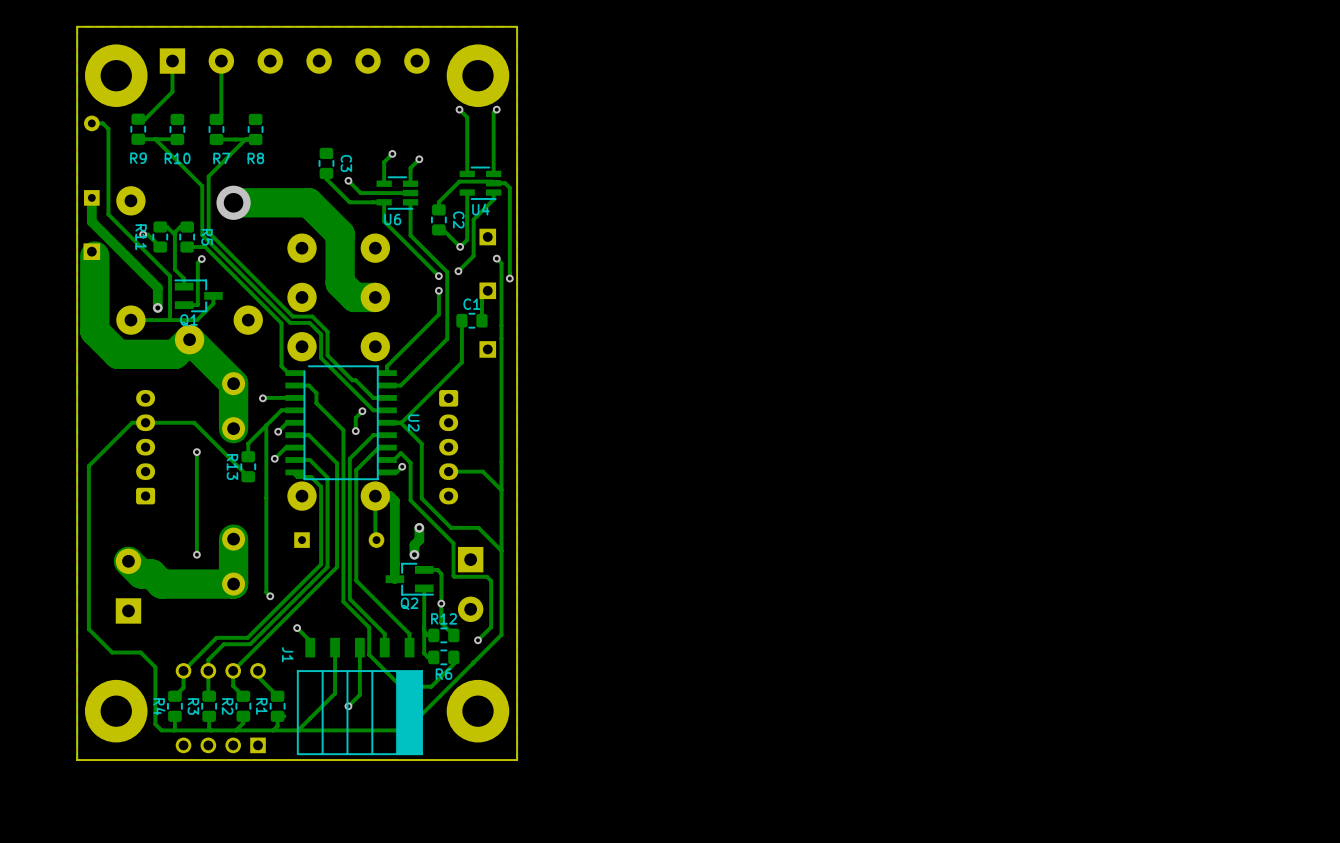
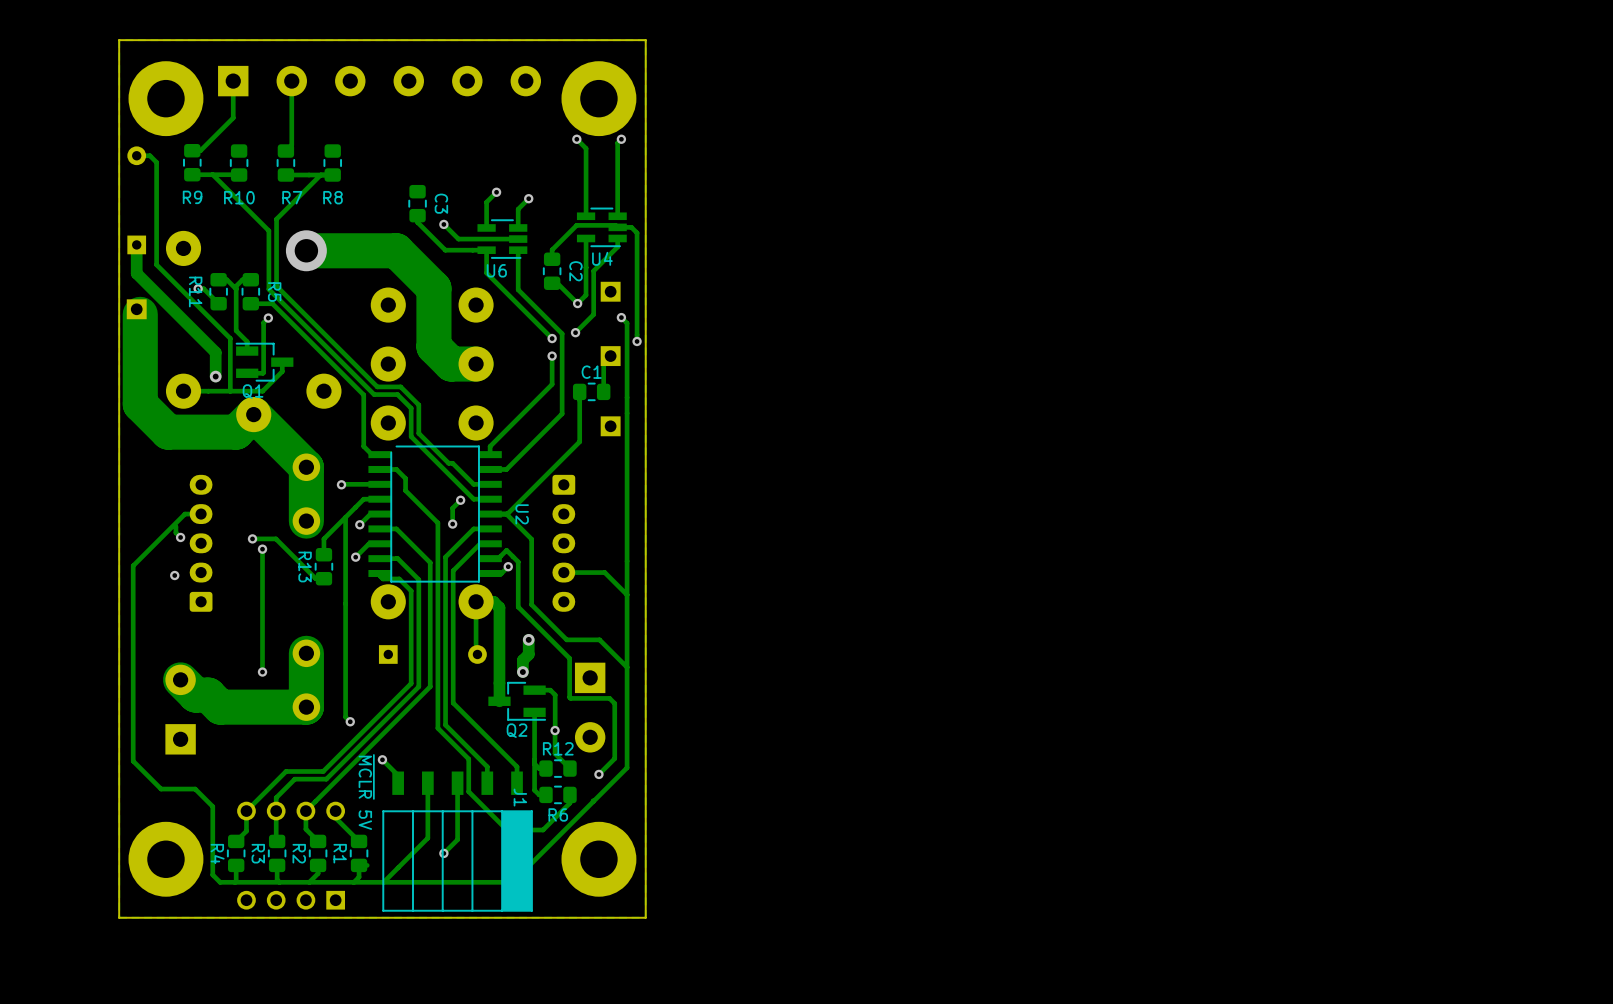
track: (149, 422) (194, 422) (248, 476) -> (252, 538) (275, 538) (315, 578) (323, 578)
track: none -> (174, 525) (175, 532) (180, 537)
via: none -> (180, 537)
via: none -> (252, 538)
via: none -> (174, 575)
text: none -> ~{MCLR} 5V (366, 792)
J1 name position: J1 (287, 654) -> J1 (520, 797)

